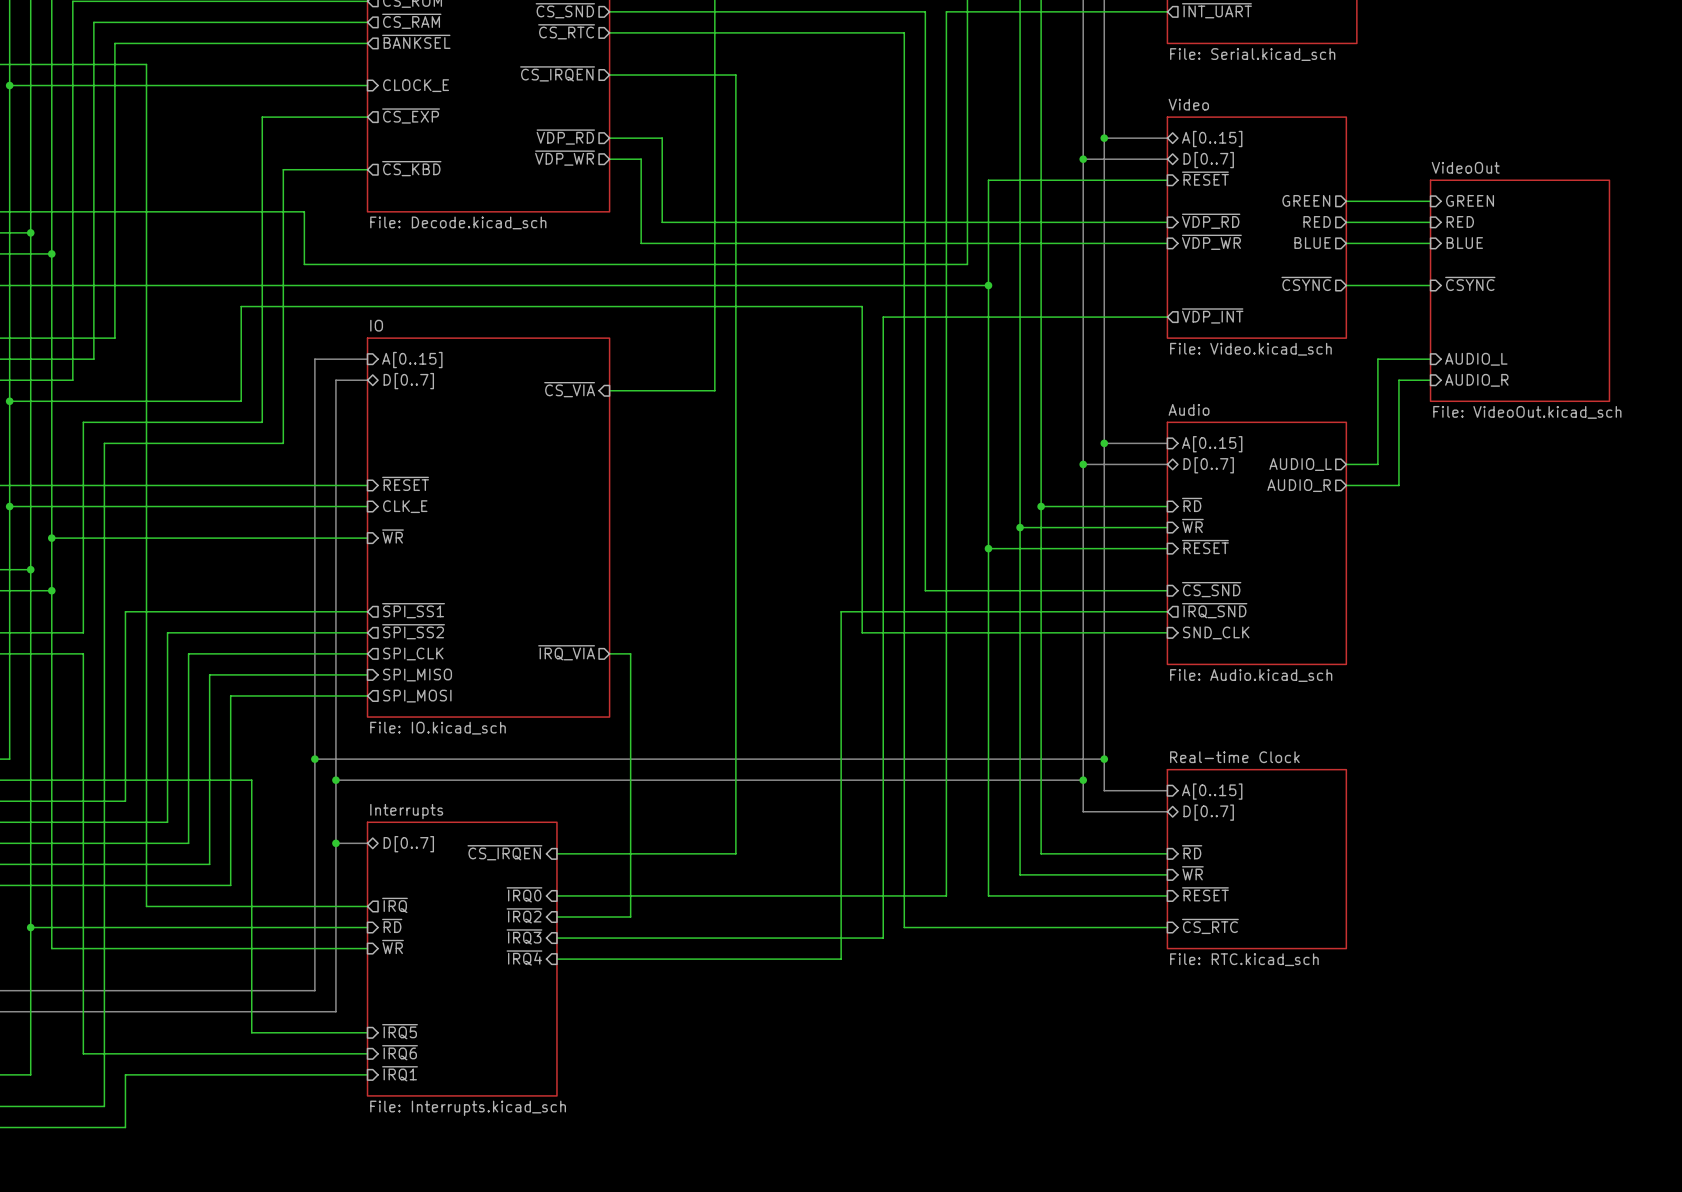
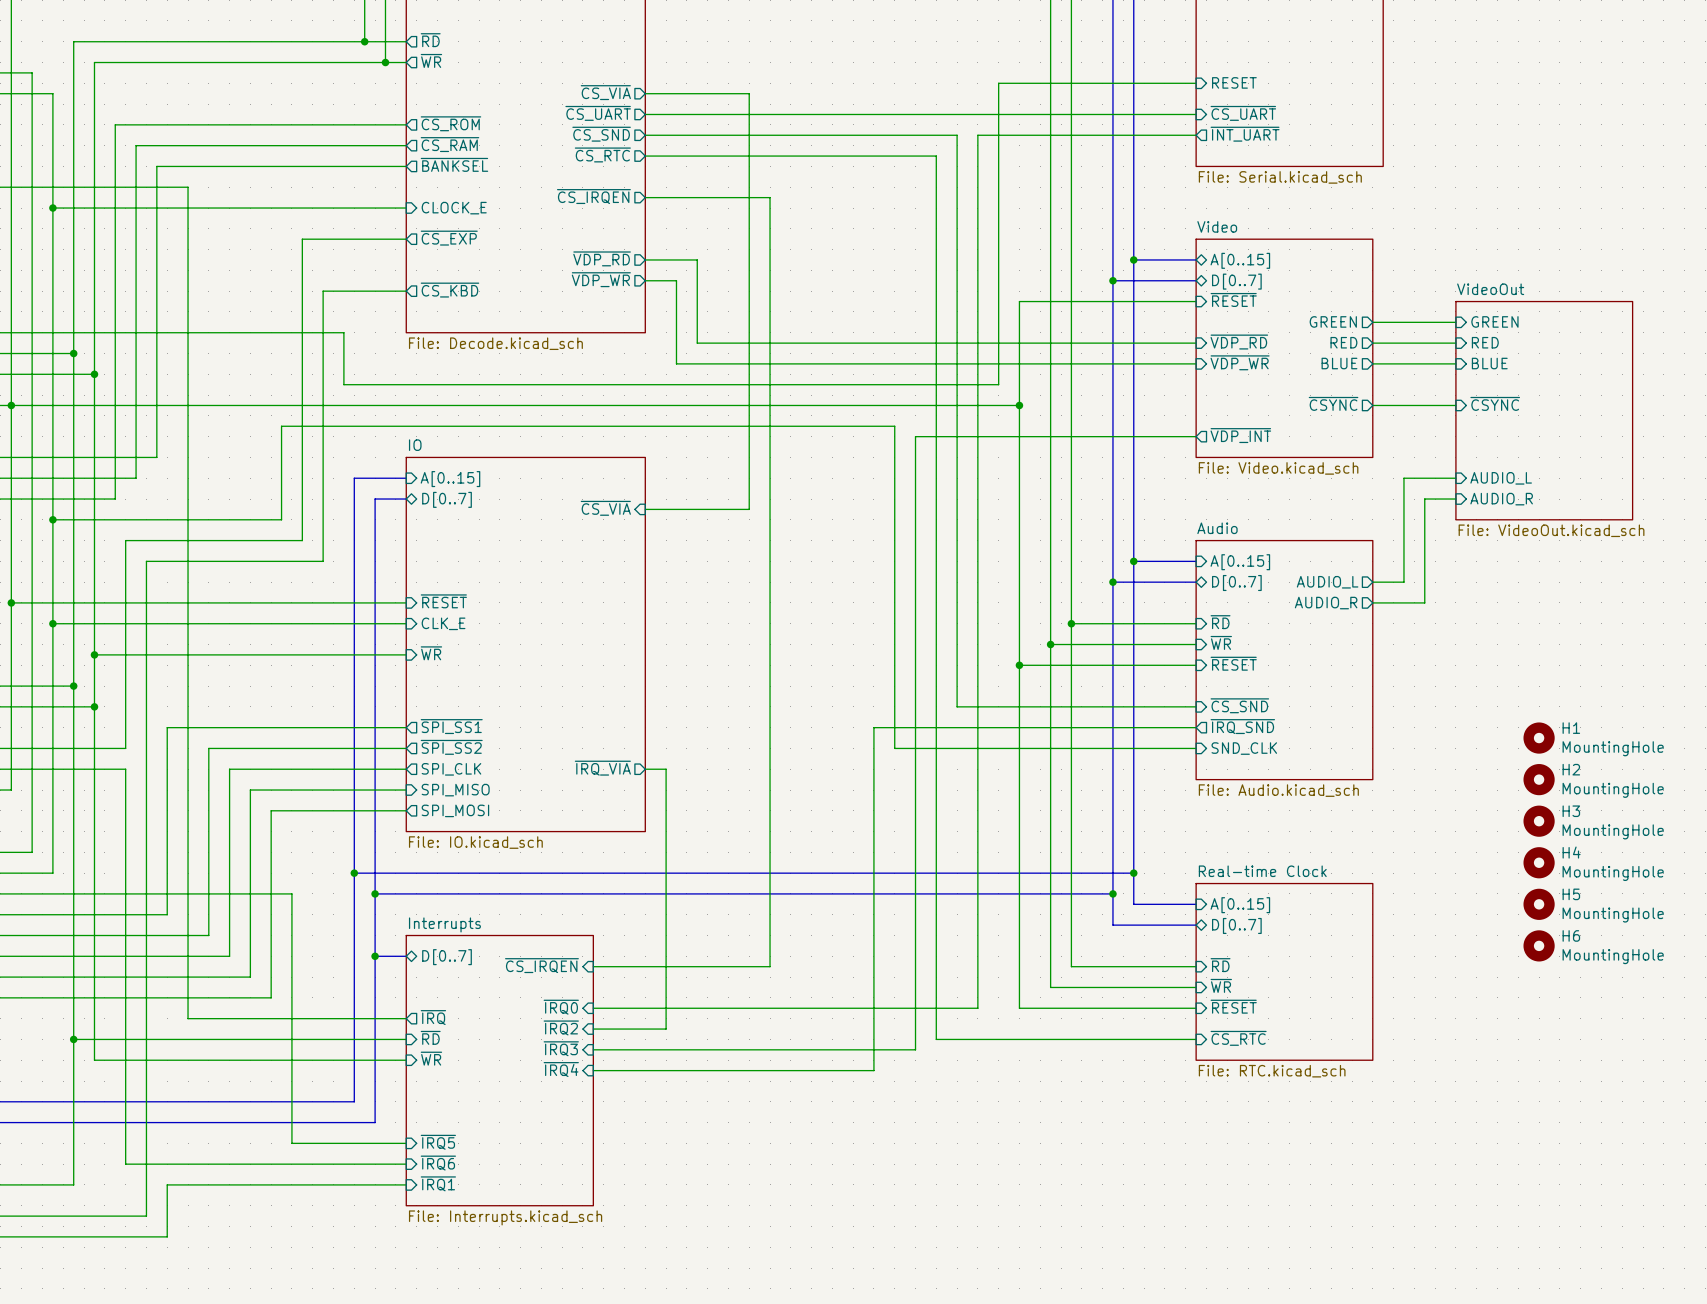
H1: none -> MountingHole (1539, 738)
H2: none -> MountingHole (1539, 779)
H3: none -> MountingHole (1539, 821)
H4: none -> MountingHole (1539, 862)
H5: none -> MountingHole (1539, 904)
H6: none -> MountingHole (1539, 945)

